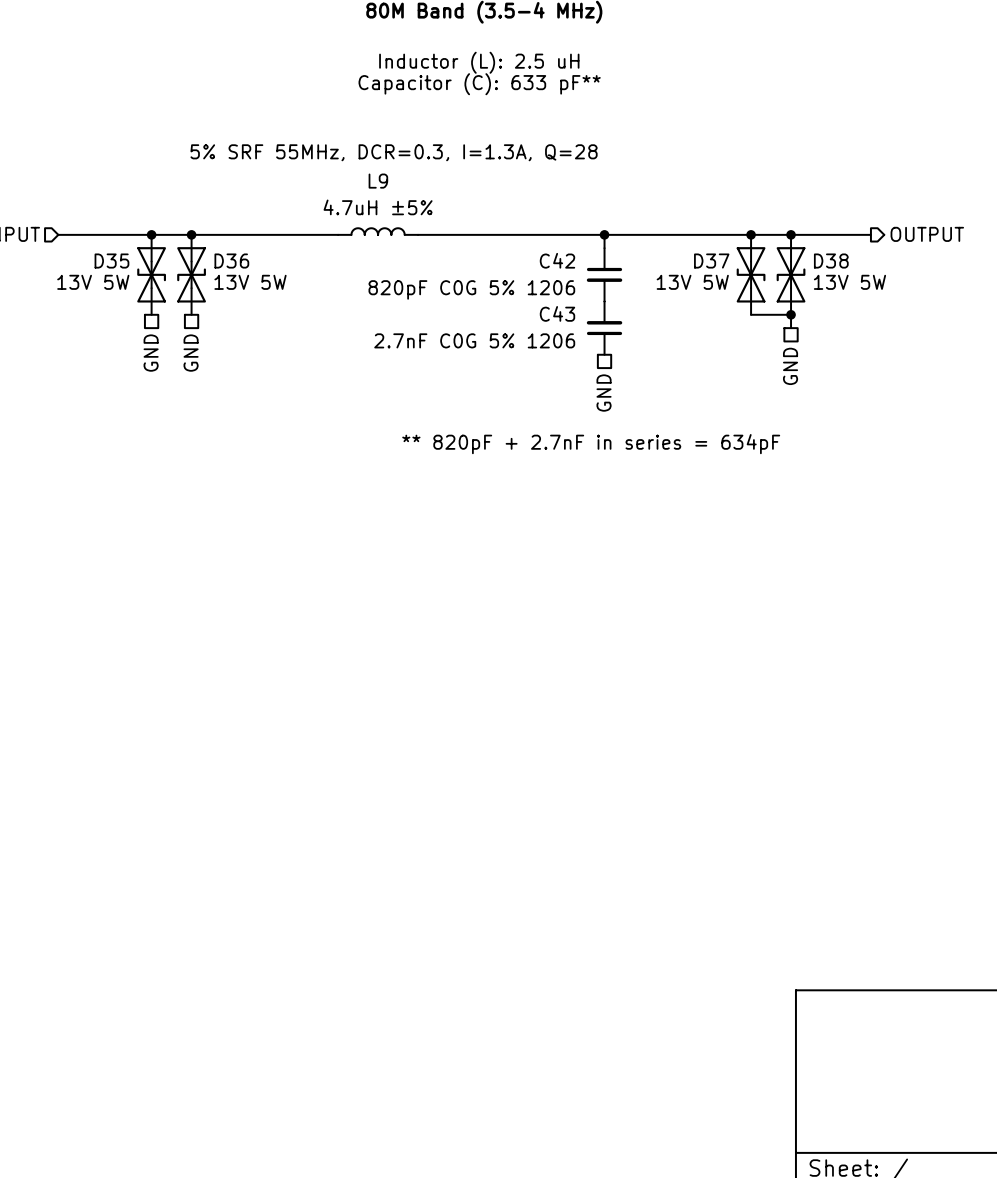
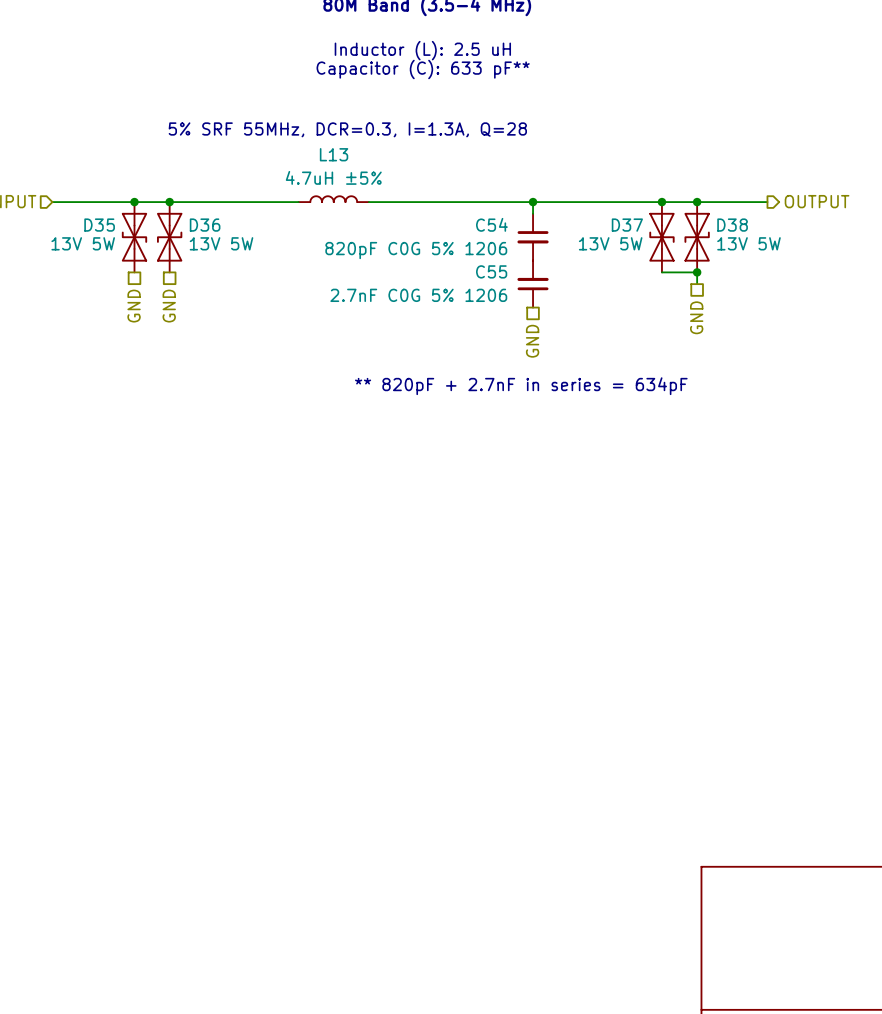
L9 name: L9 (378, 181) -> L13 (334, 154)
C42 name: C42 (557, 260) -> C54 (491, 224)
C43 name: C43 (557, 313) -> C55 (491, 271)

